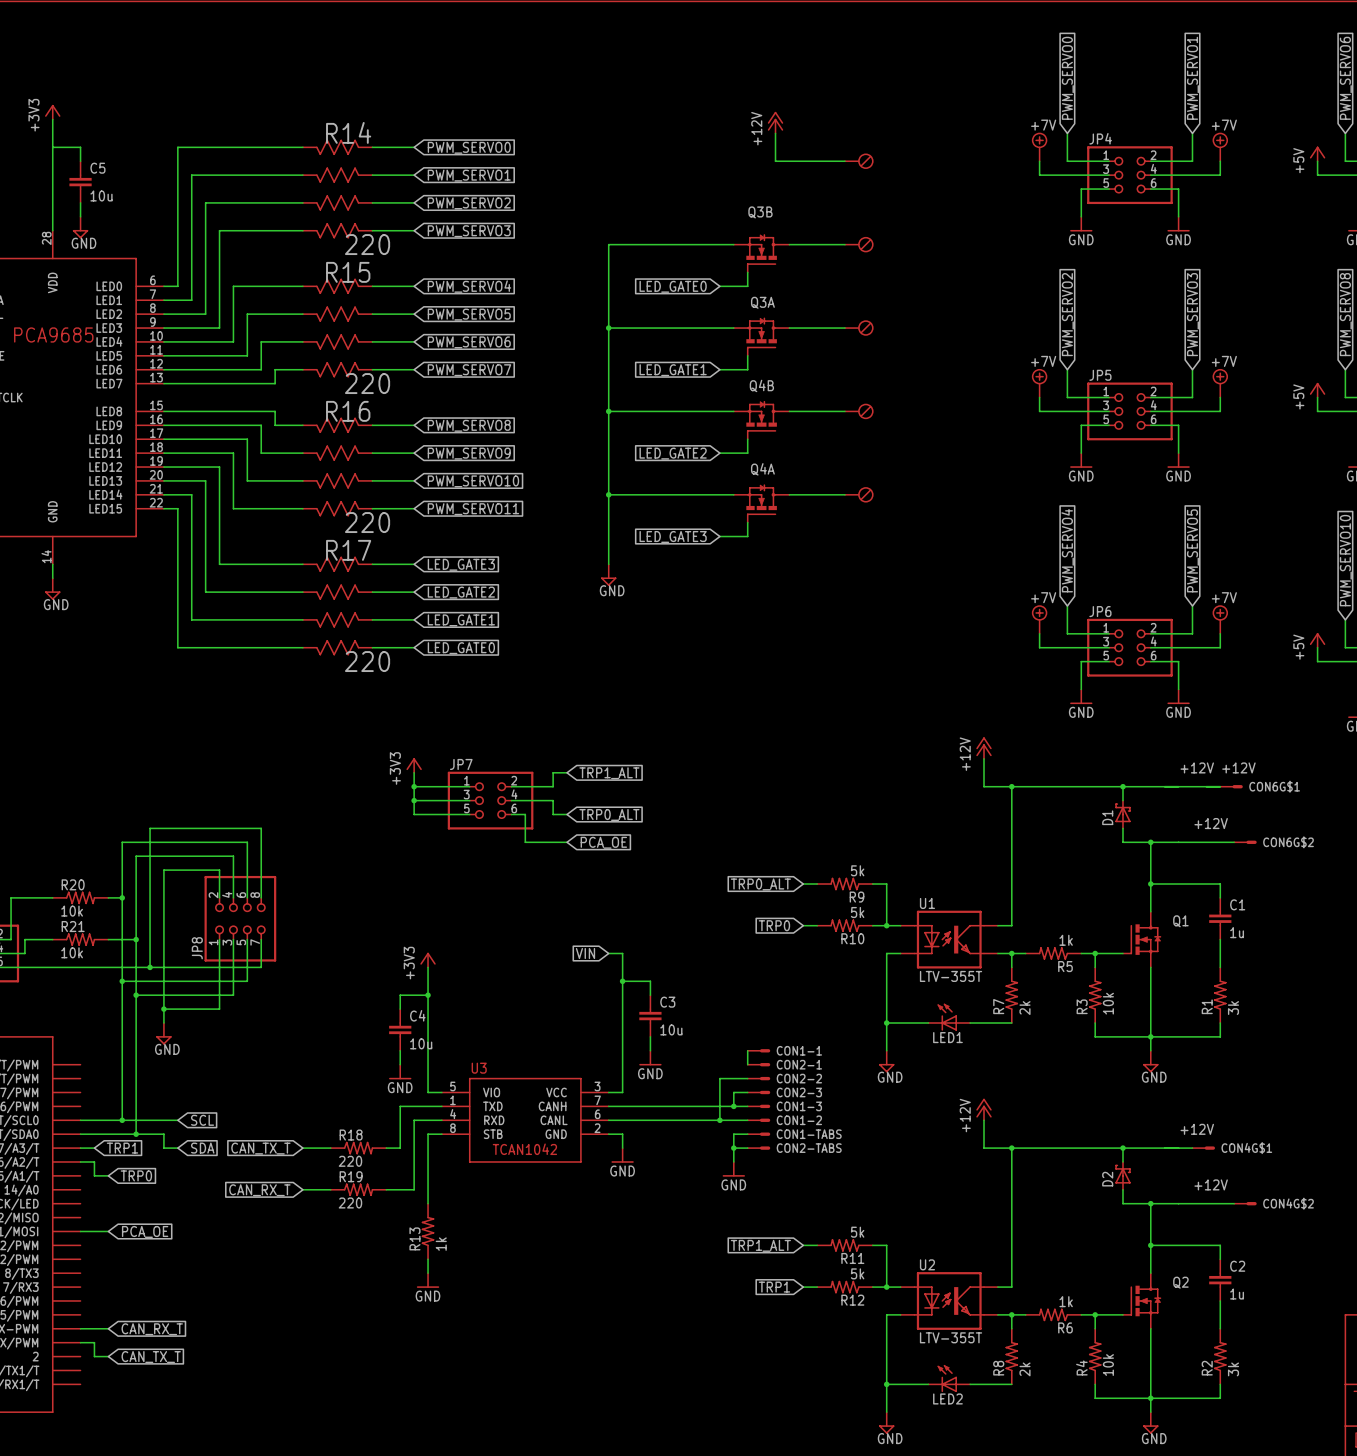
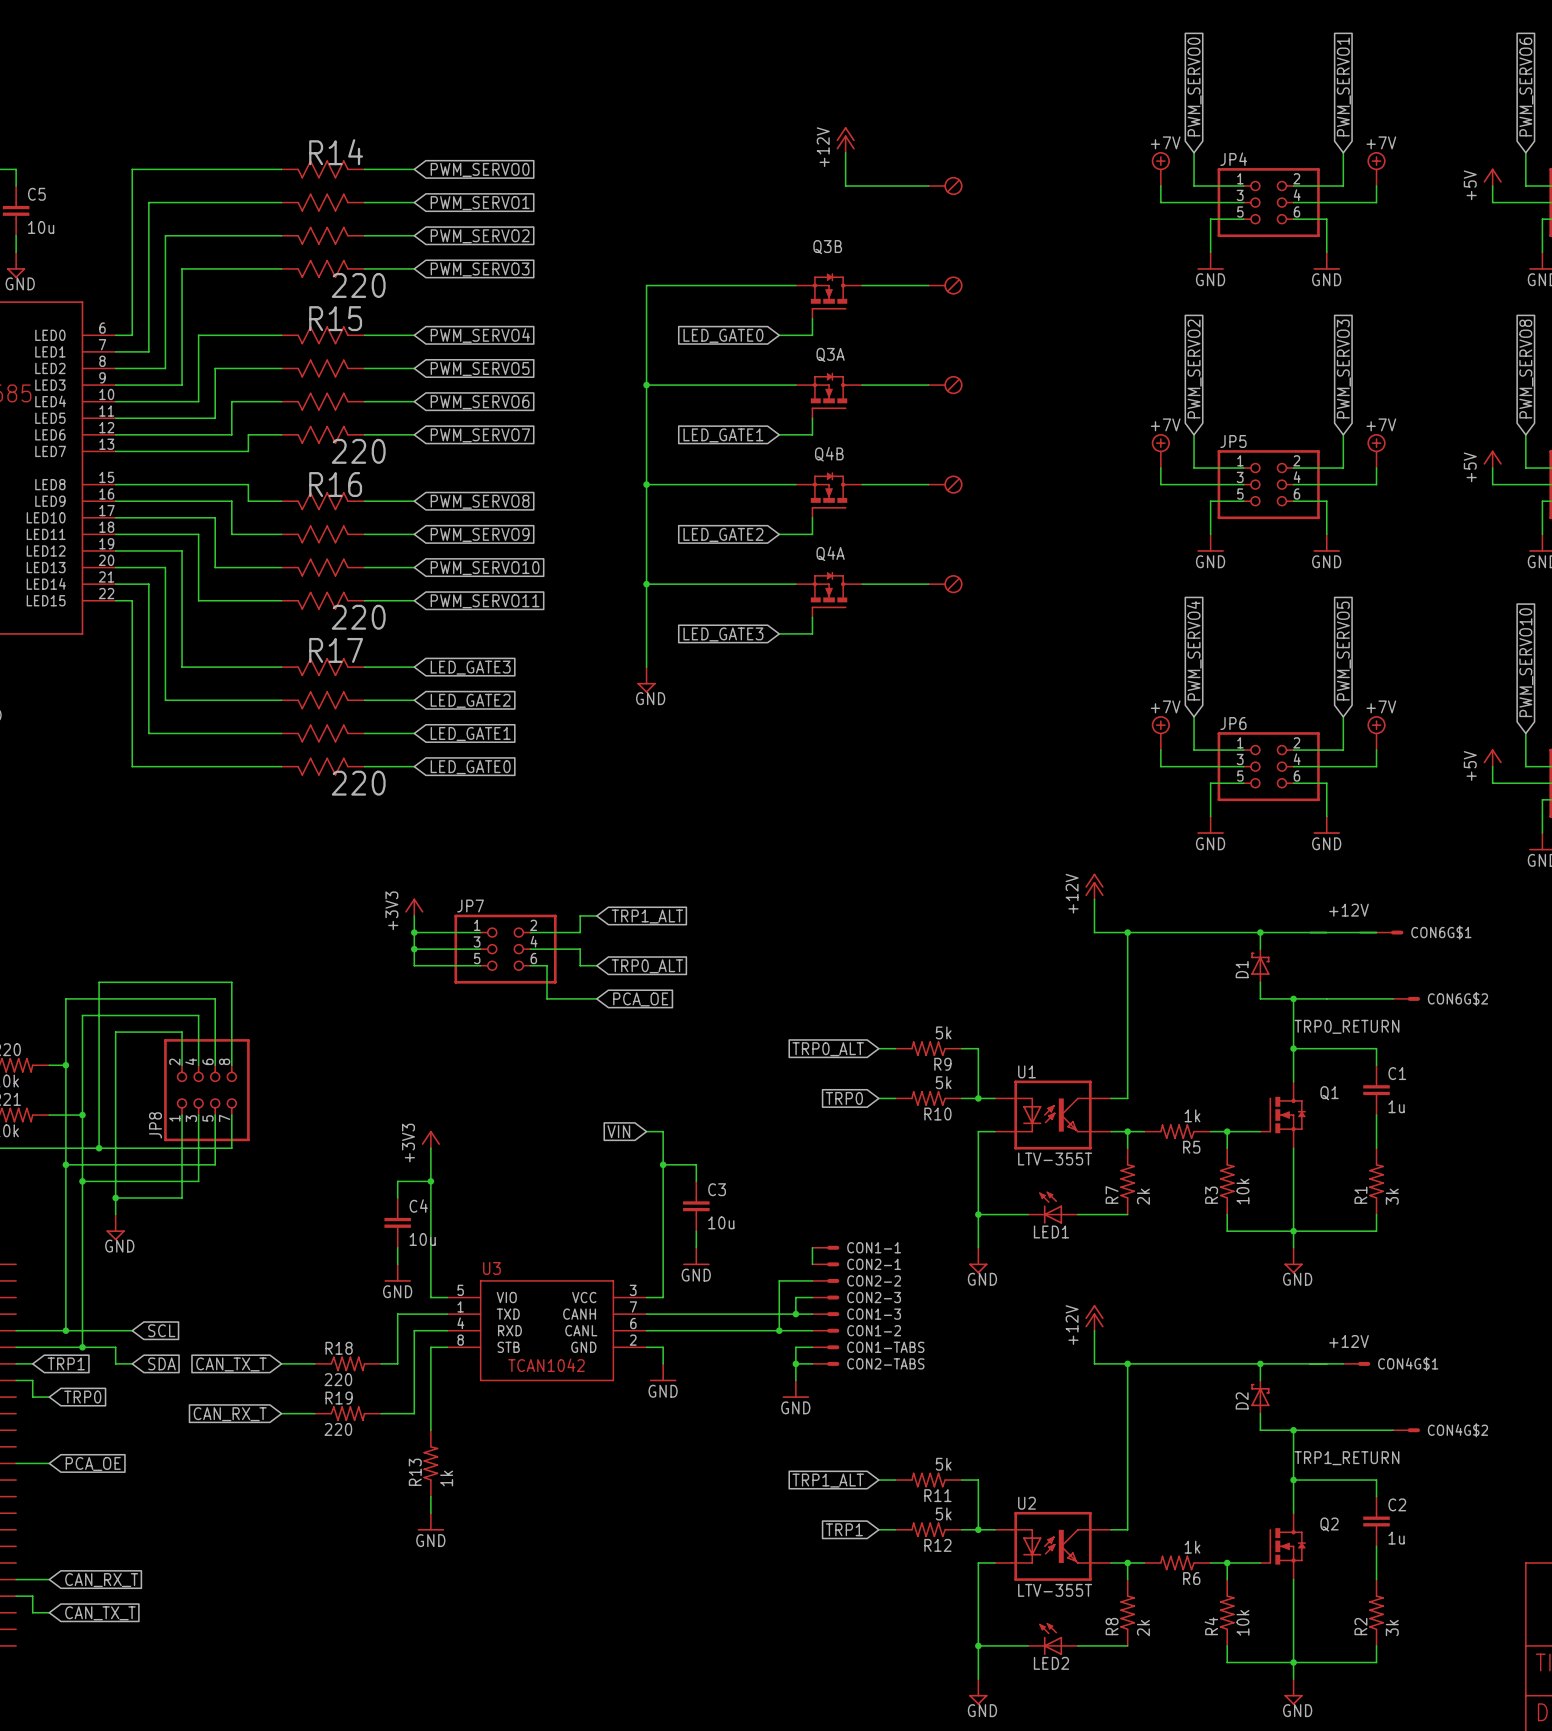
label: +12V (1238, 767) -> none
label: +12V (1211, 823) -> none
label: none -> TRP0_RETURN (1346, 1026)
label: +12V (1211, 1184) -> none
label: none -> TRP1_RETURN (1346, 1458)

